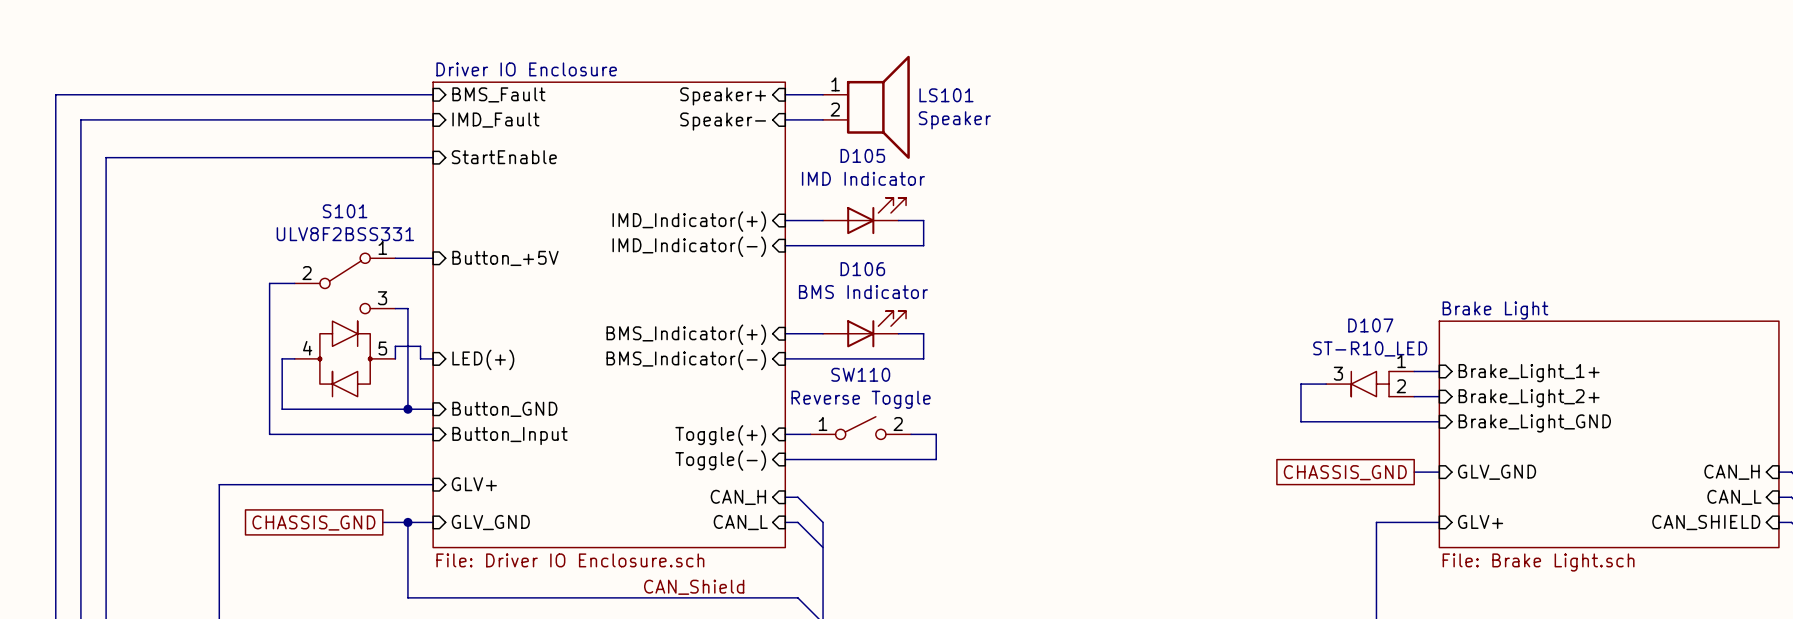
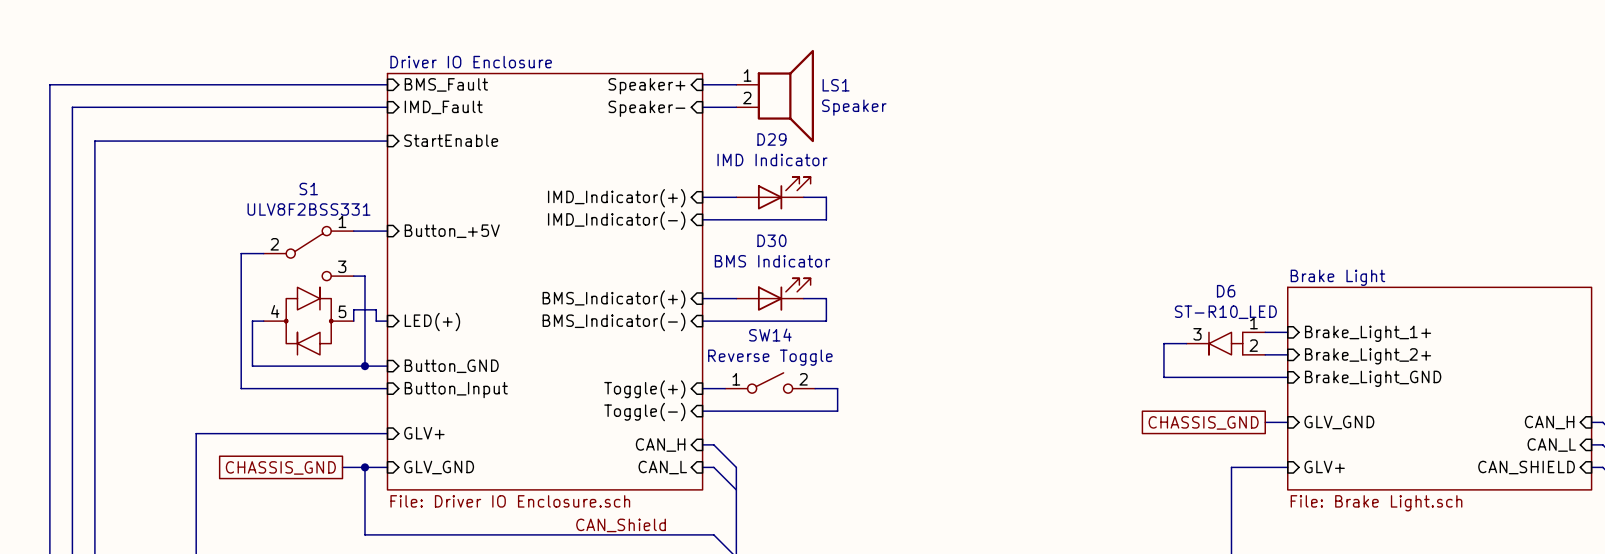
LS101 name: LS101 (946, 95) -> LS1 (836, 85)
D105 name: D105 (862, 155) -> D29 (771, 139)
S101 name: S101 (345, 211) -> S1 (308, 189)
D106 name: D106 (862, 269) -> D30 (771, 240)
D107 name: D107 (1370, 325) -> D6 (1226, 291)
SW110 name: SW110 (860, 374) -> SW14 (770, 335)

